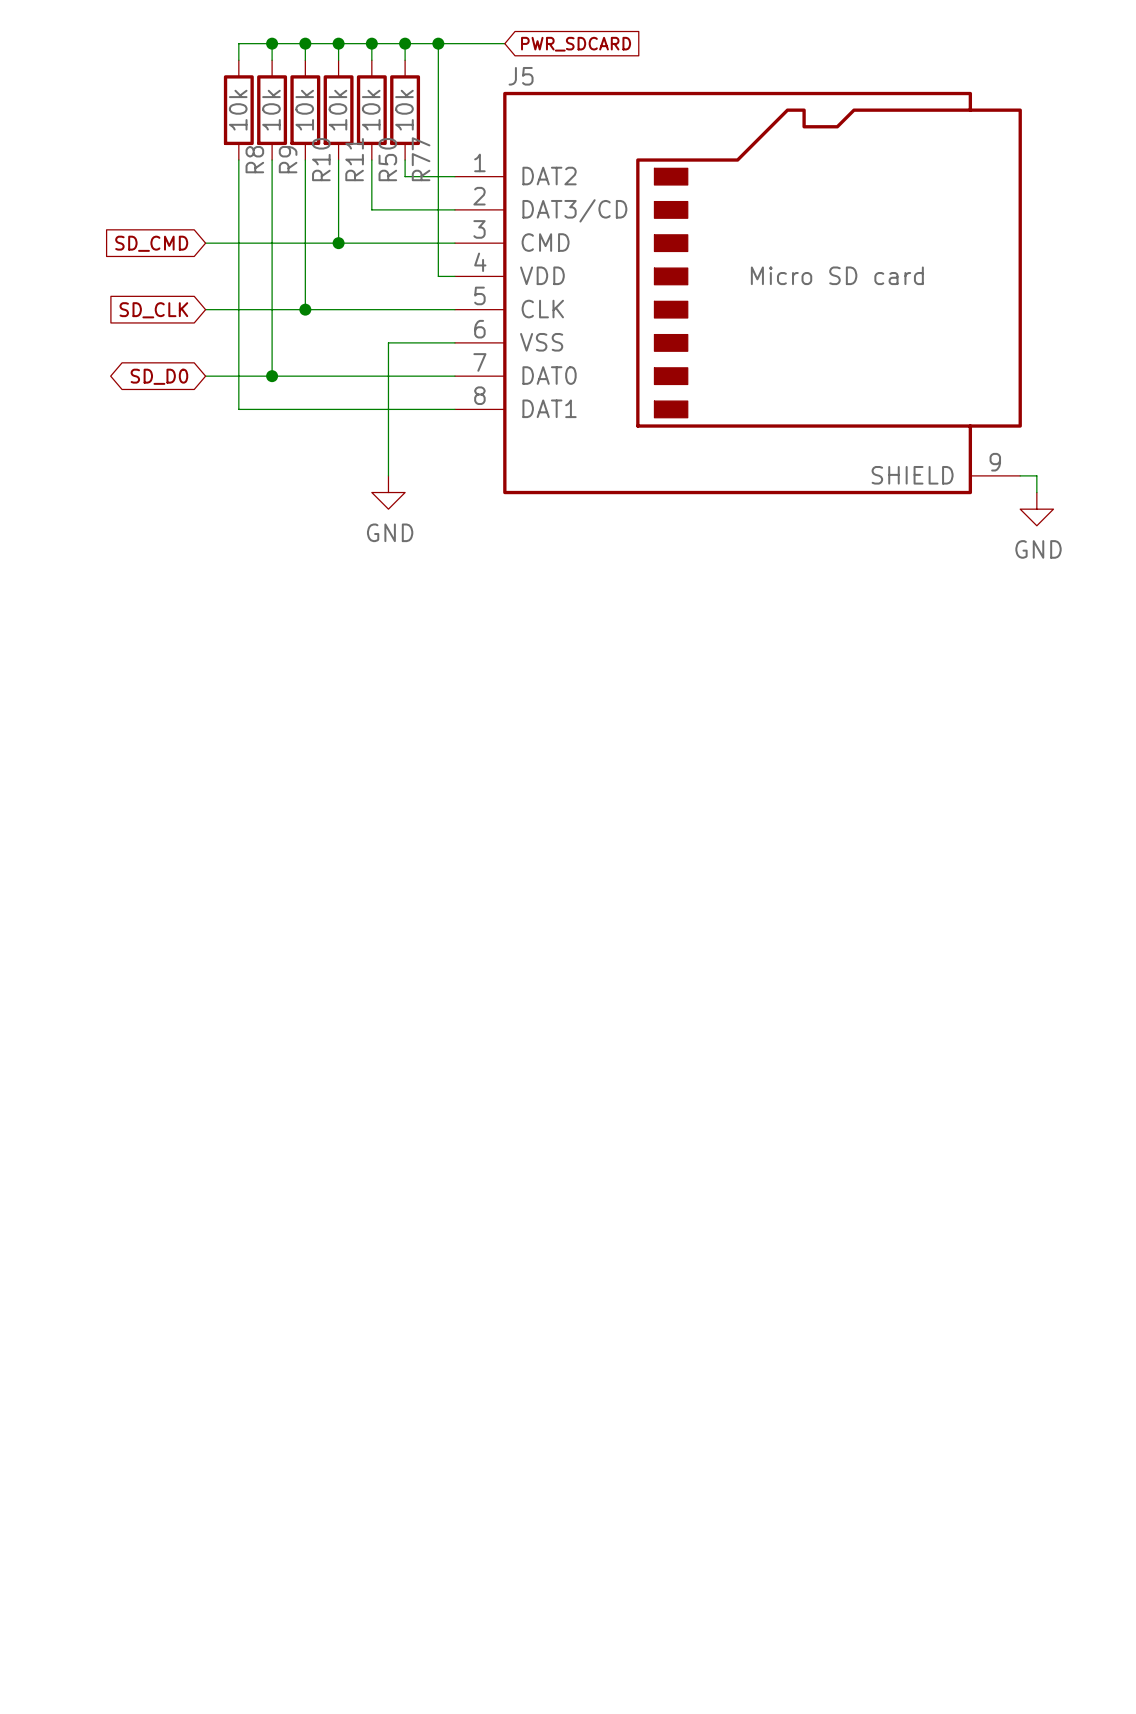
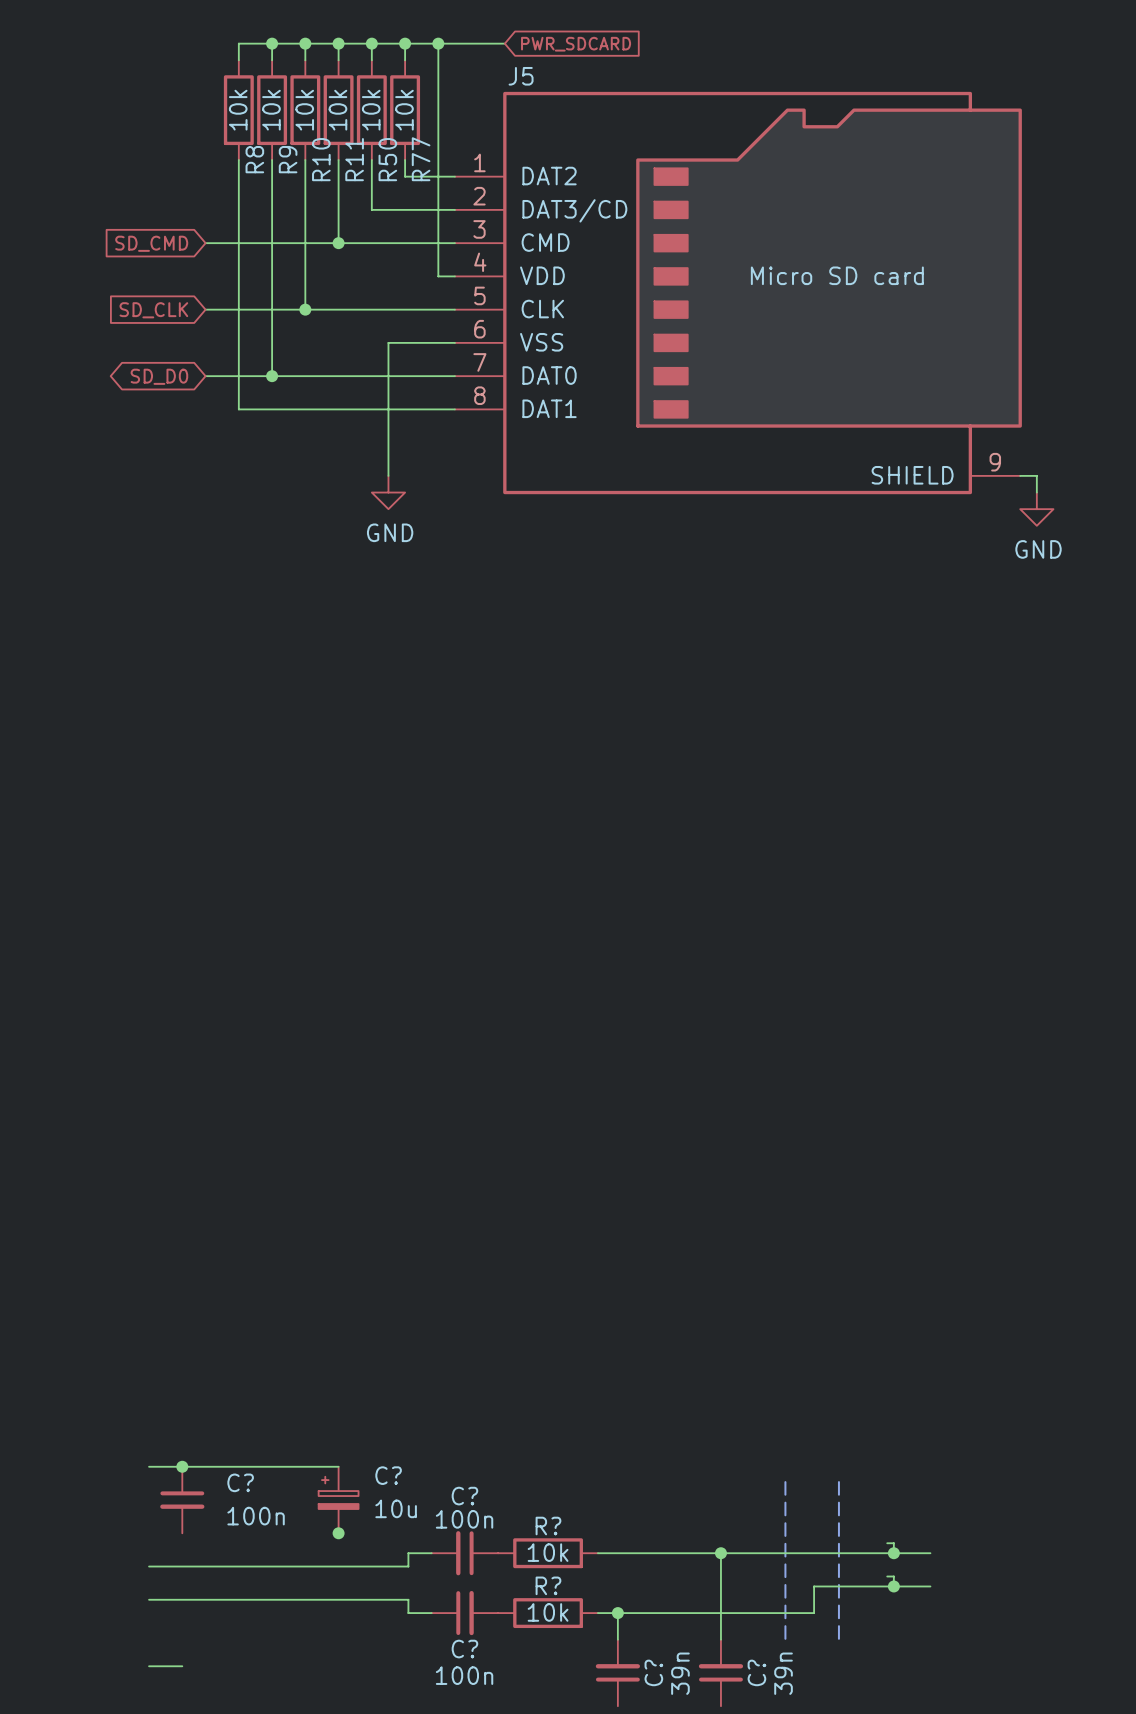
wire: none -> (149, 1466) (338, 1466)
junction: none -> (182, 1466)
C?: none -> 100n (182, 1500)
C?: none -> 10u (338, 1500)
junction: none -> (338, 1533)
wire: none -> (887, 1543) (893, 1543) (893, 1553)
wire: none -> (431, 1553) (408, 1553) (408, 1566) (149, 1566)
C?: none -> 100n (464, 1553)
R?: none -> 10k (548, 1553)
wire: none -> (597, 1553) (930, 1553)
wire: none -> (720, 1553) (720, 1639)
junction: none -> (720, 1553)
junction: none -> (893, 1553)
text: none -> -------- (785, 1560)
text: none -> -------- (838, 1560)
wire: none -> (887, 1576) (893, 1576) (893, 1586)
junction: none -> (893, 1586)
wire: none -> (930, 1586) (814, 1586) (814, 1613) (597, 1613)
wire: none -> (149, 1599) (408, 1599) (408, 1613) (431, 1613)
C?: none -> 100n (464, 1613)
R?: none -> 10k (548, 1613)
wire: none -> (617, 1613) (617, 1639)
junction: none -> (617, 1613)
wire: none -> (149, 1666) (182, 1666)
C?: none -> 39n (617, 1672)
C?: none -> 39n (720, 1672)

